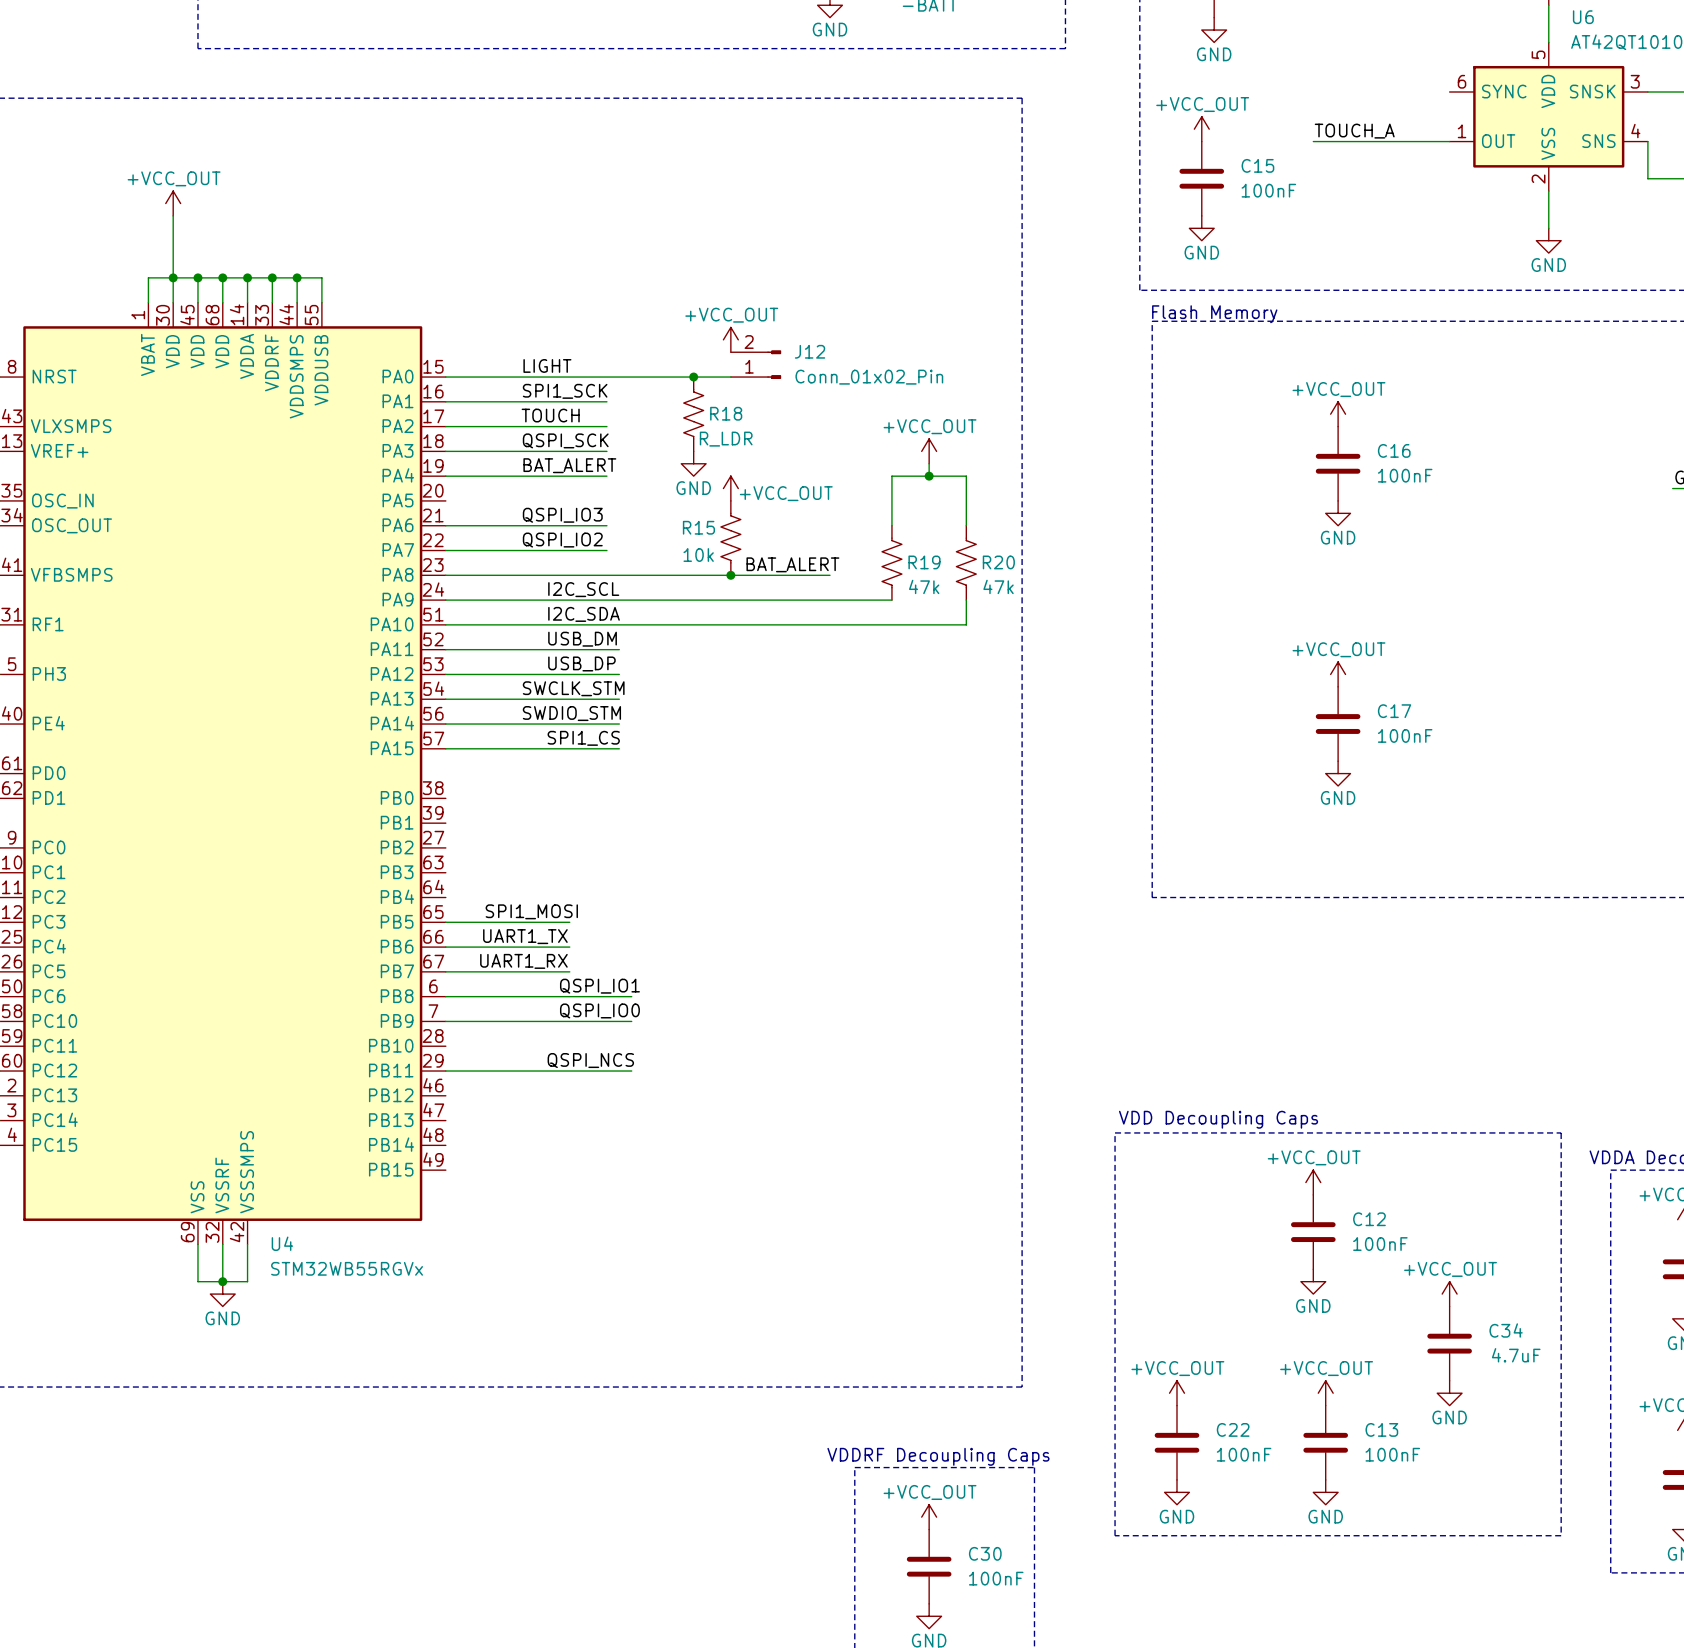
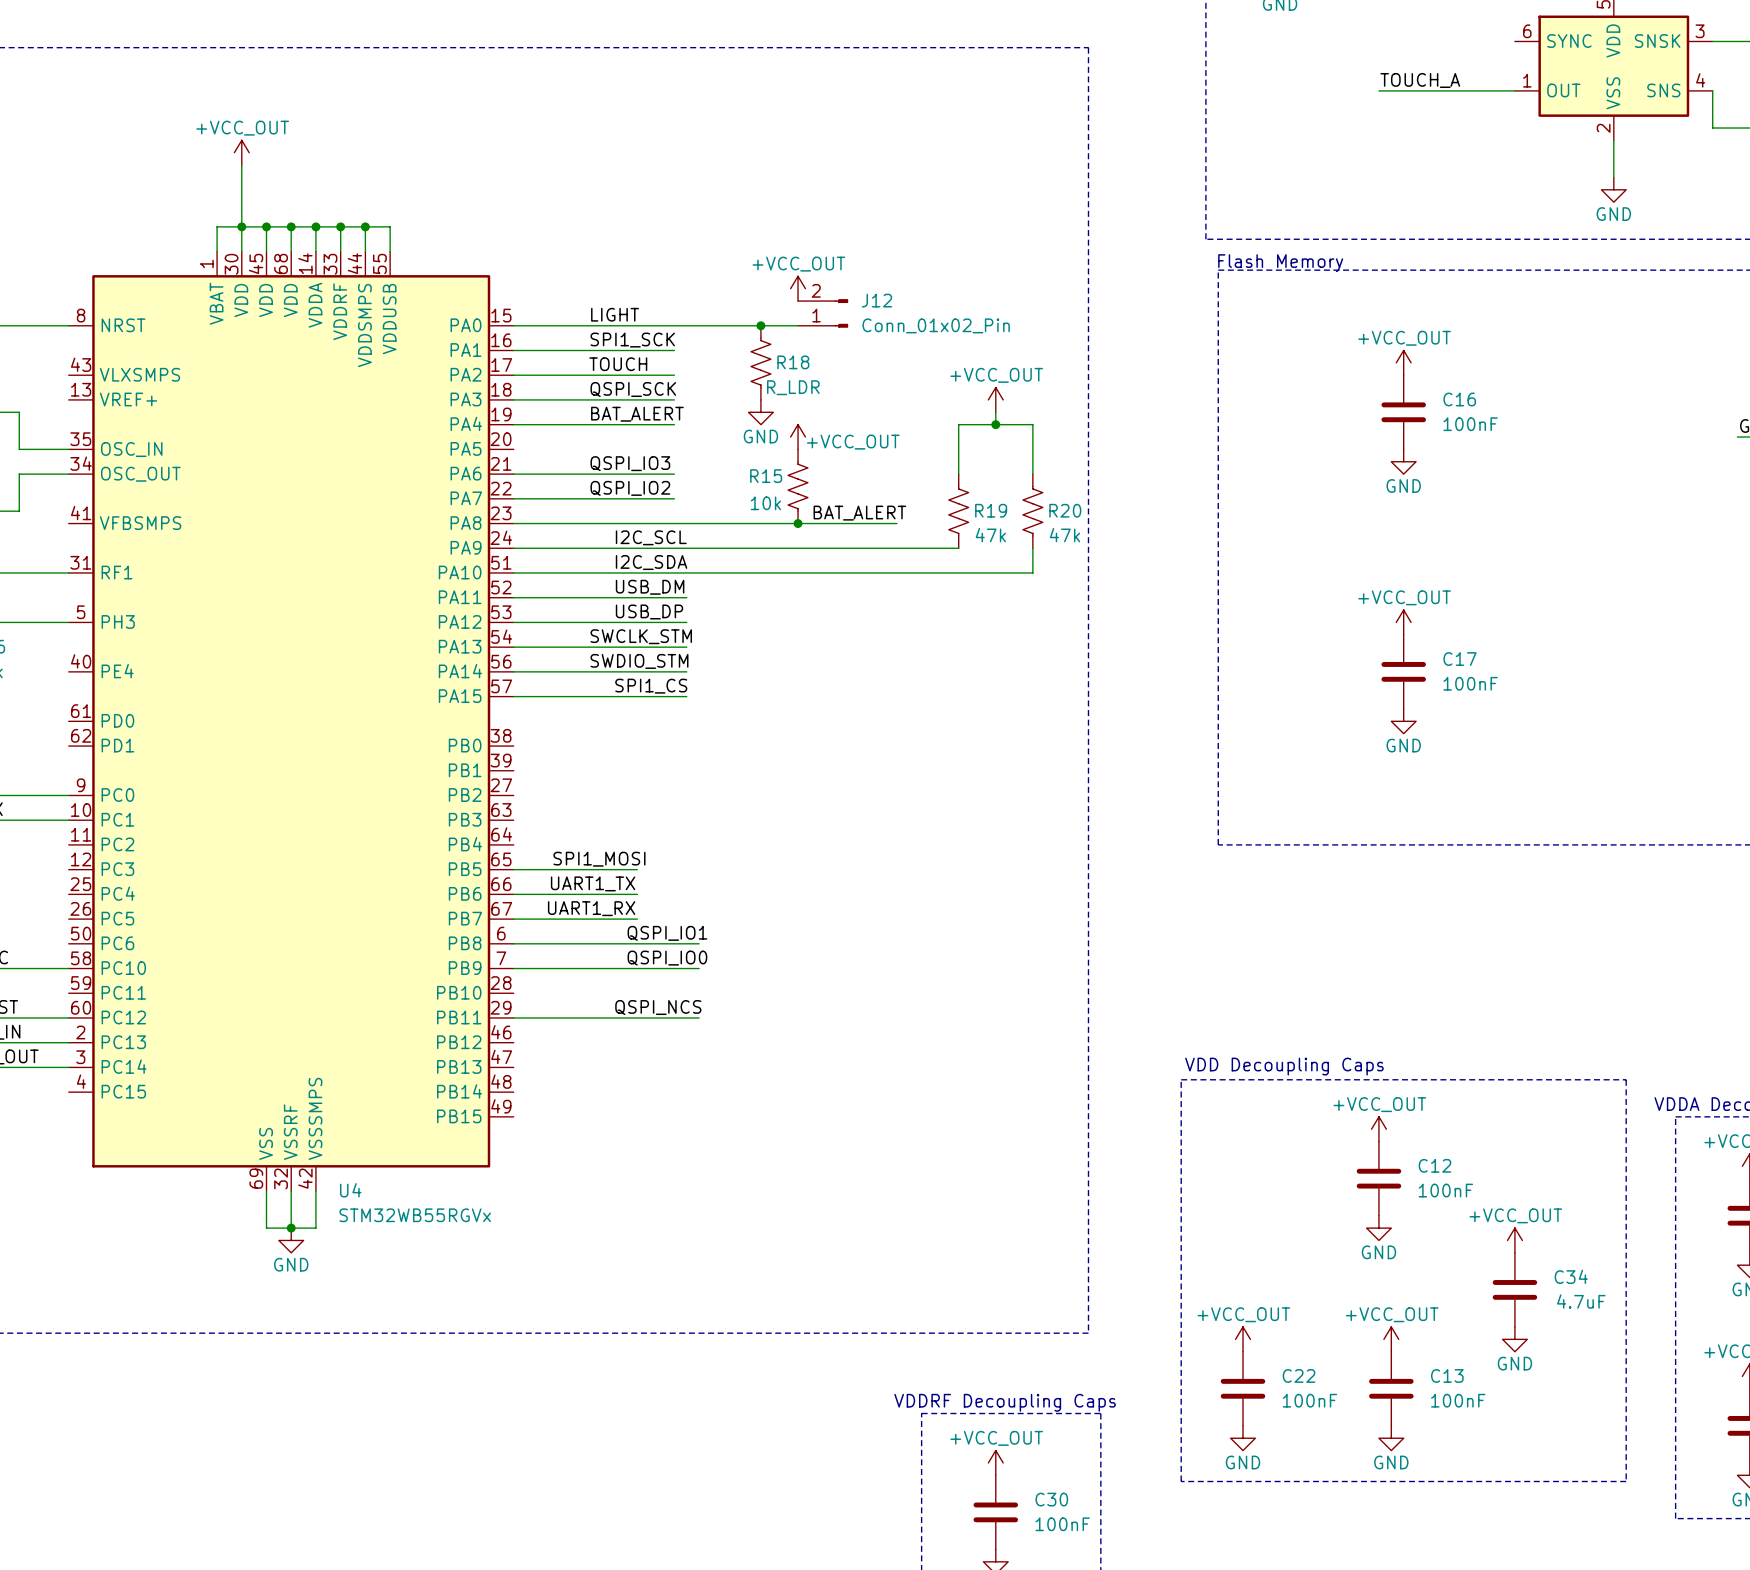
power symbol: +VCC_OUT (1201, 129) -> none
C15: 100nF (1201, 178) -> none
power symbol: GND (1201, 228) -> none

